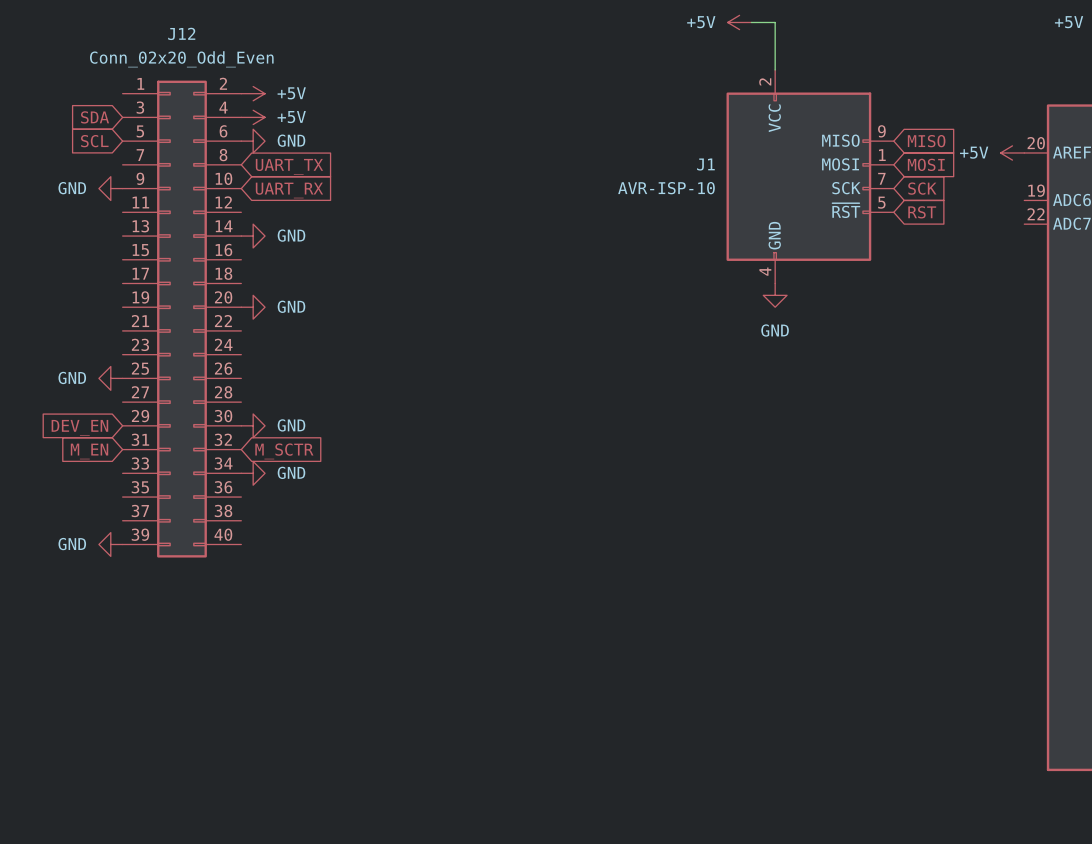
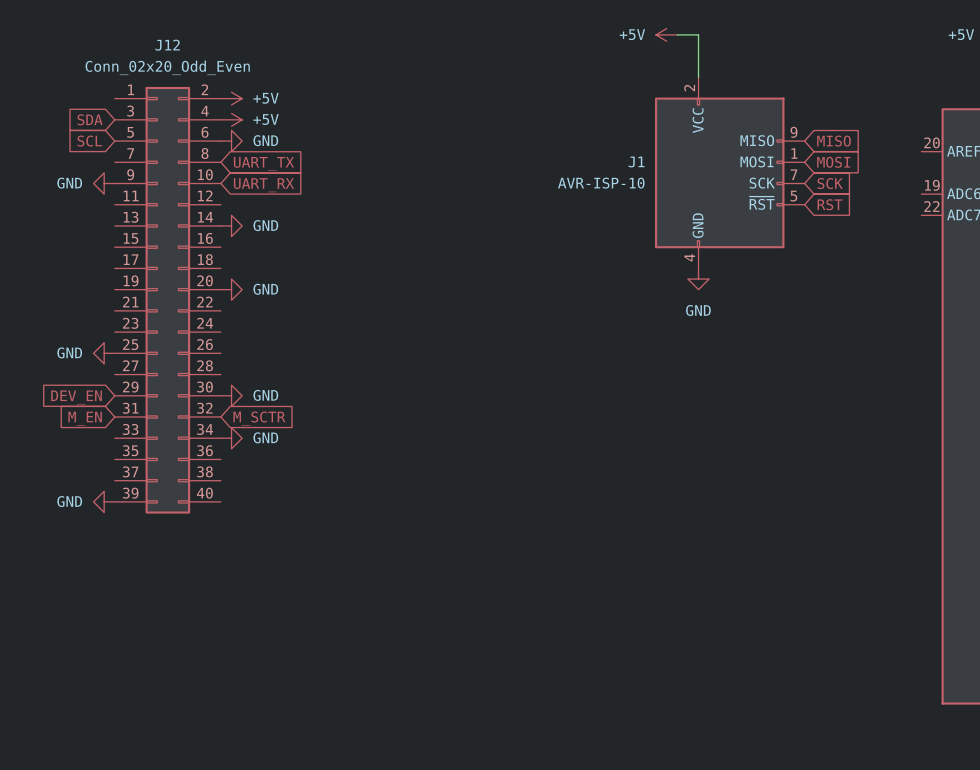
power symbol: +5V (1012, 152) -> none

